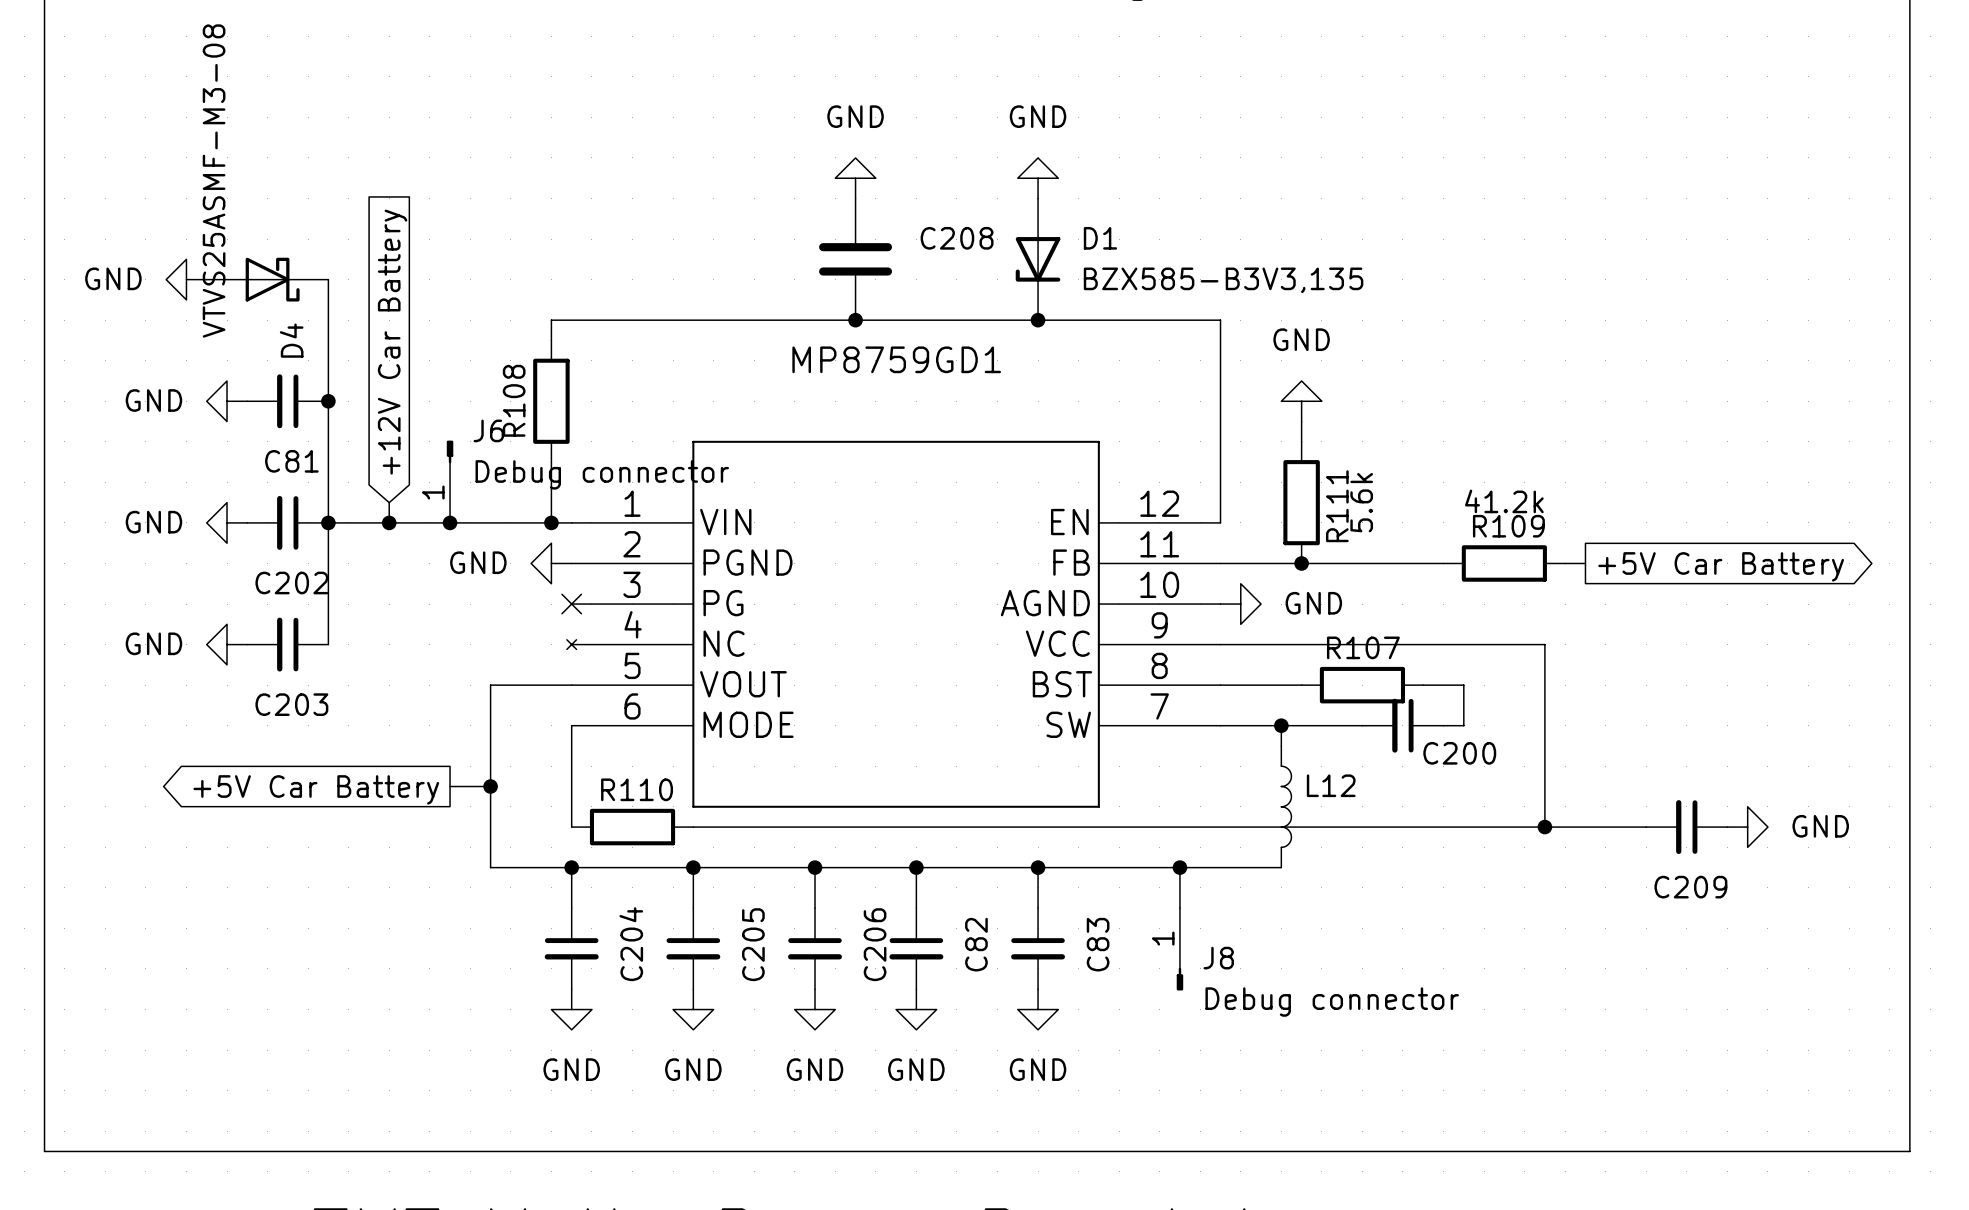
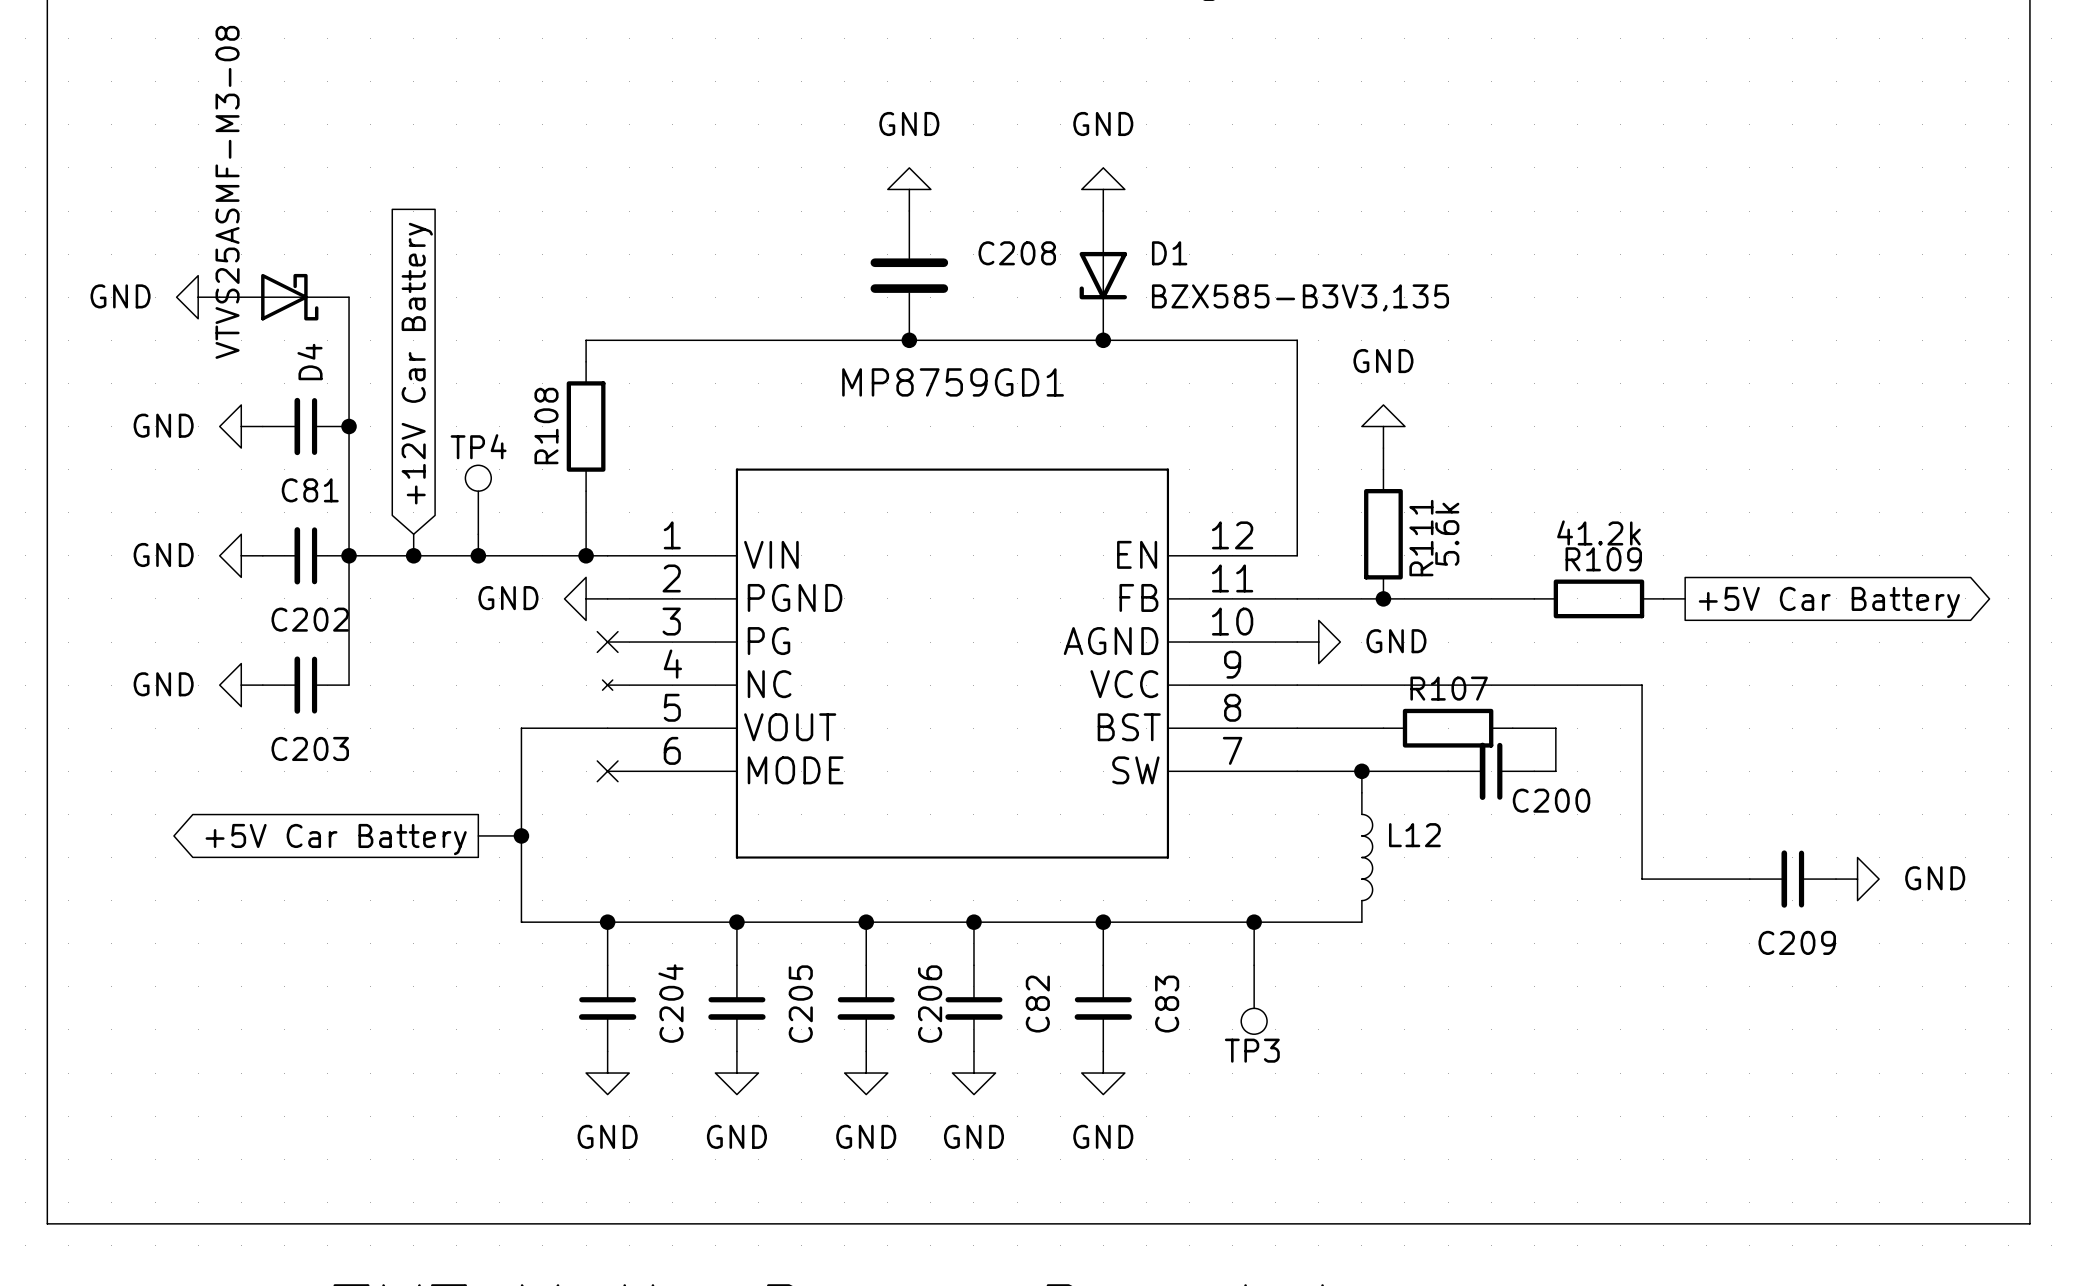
TP4: none -> (478, 499)
J6: Debug connector (450, 481) -> none
wire: (571, 725) (571, 827) -> none
no-connect mark: none -> (607, 771)
R110: (632, 827) -> none
wire: (693, 827) (1544, 827) -> none
junction: (1544, 827) -> none
TP3: none -> (1254, 999)
J8: Debug connector (1179, 949) -> none

